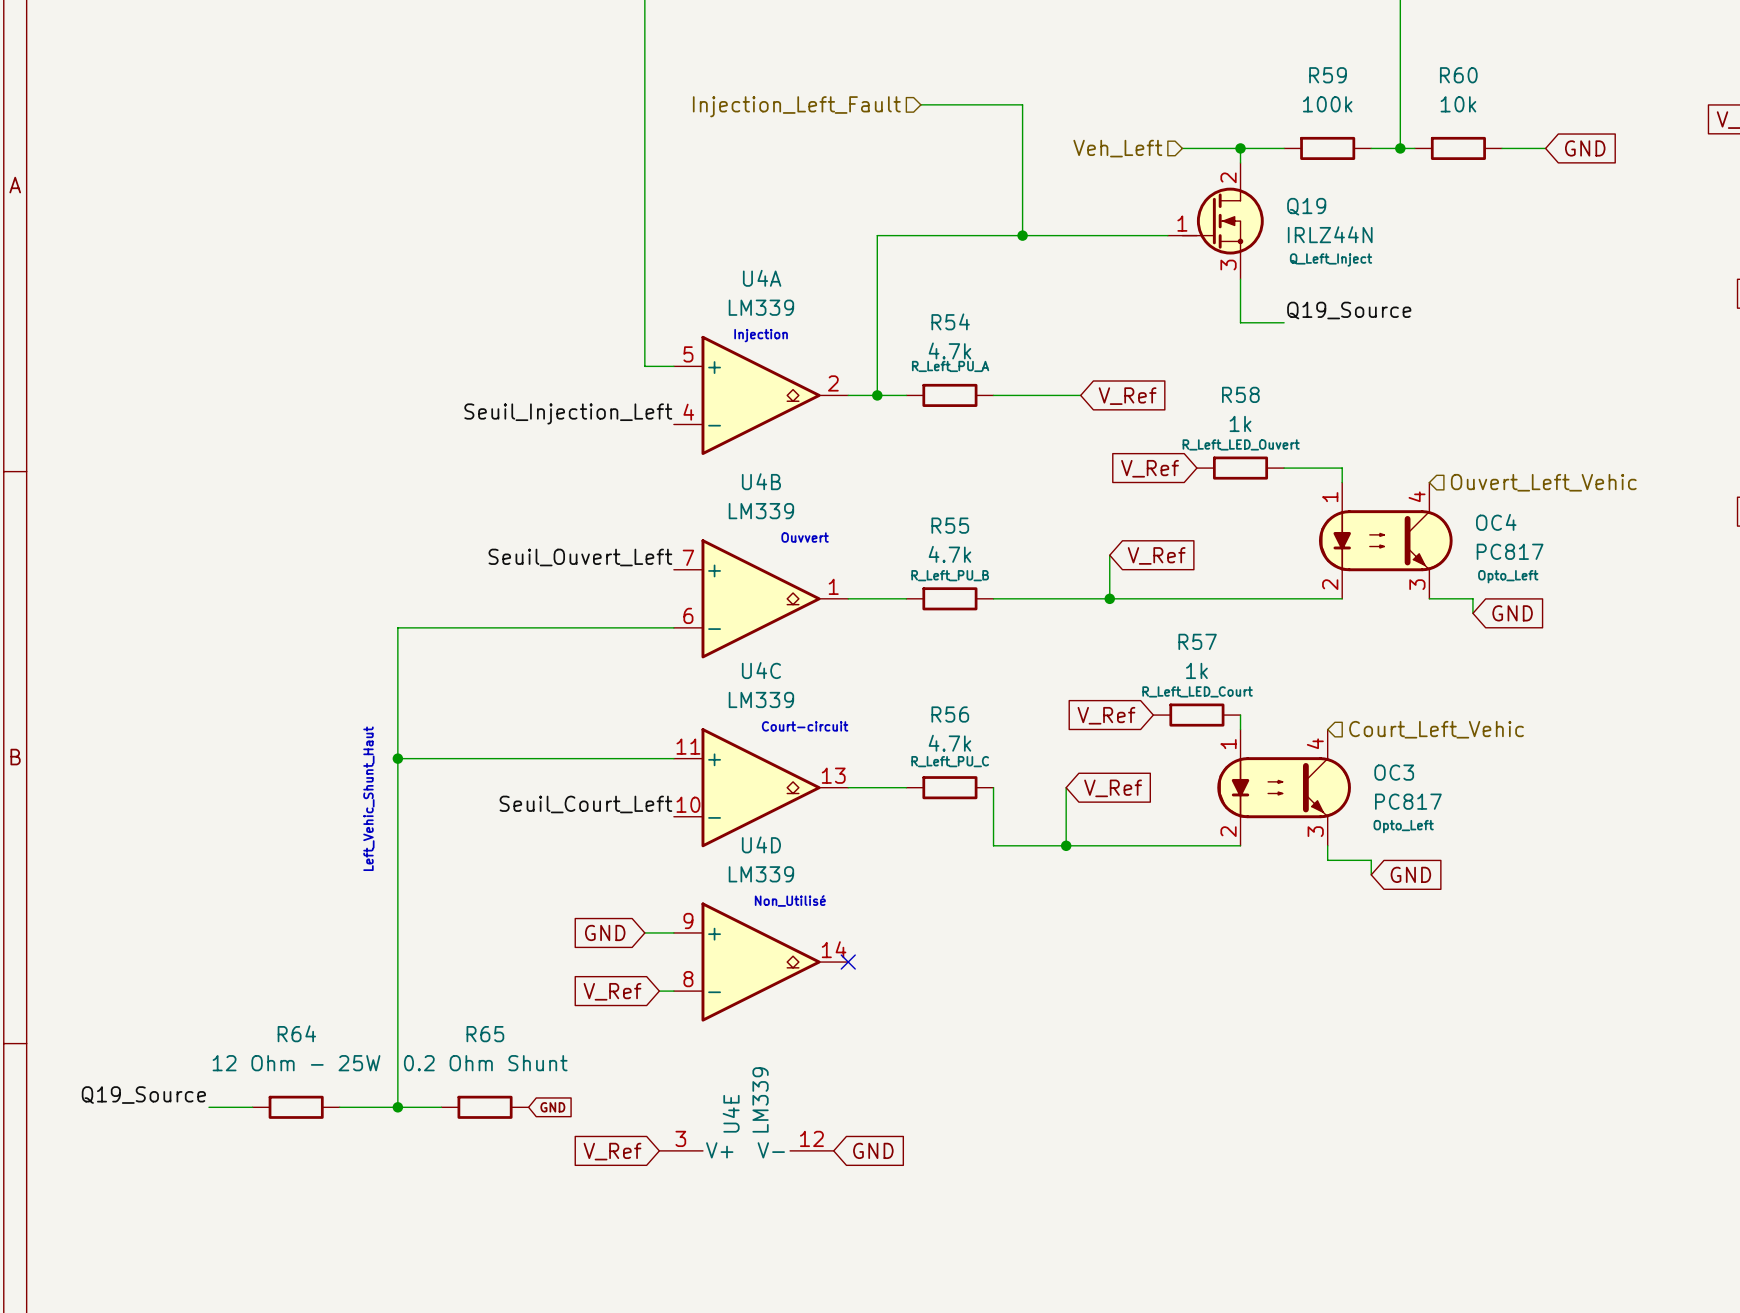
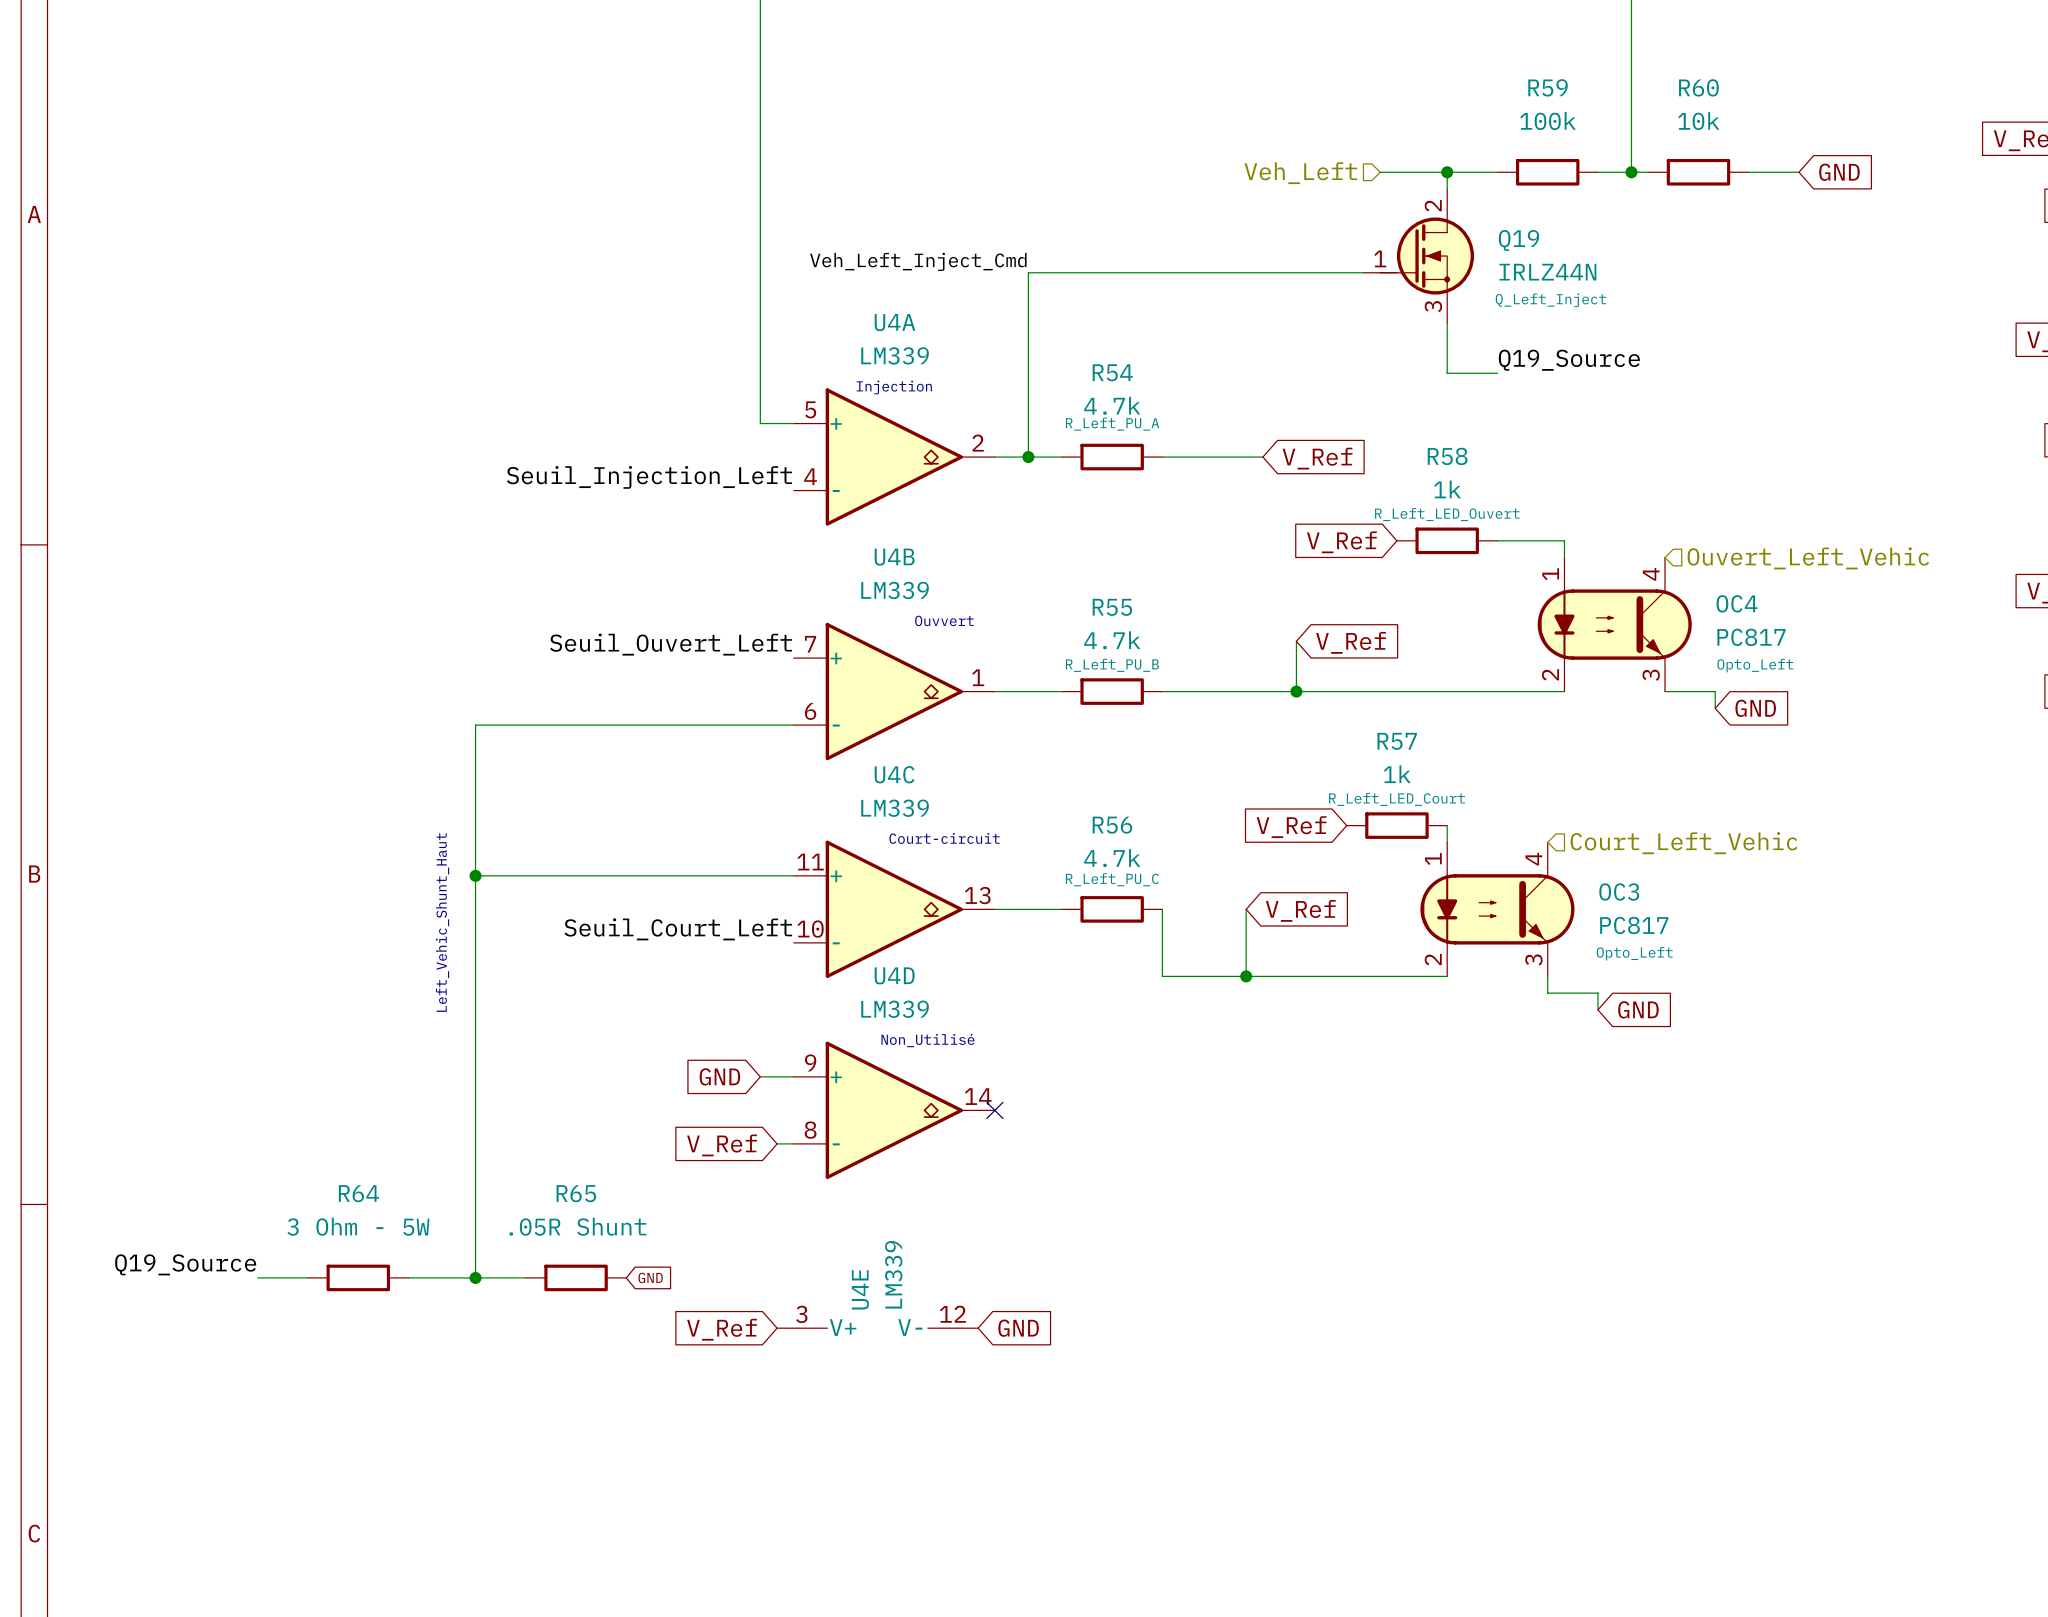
wire: (920, 104) (1022, 104) (1022, 235) -> none
hierarchical label: Injection_Left_Fault (796, 106) -> none
label: none -> Veh_Left_Inject_Cmd (918, 261)
junction: (1022, 235) -> none
R64 value: 12 Ohm - 25W (296, 1063) -> 3 Ohm - 5W (358, 1226)
R65 value: 0.2 Ohm Shunt (485, 1063) -> .05R Shunt (577, 1226)

